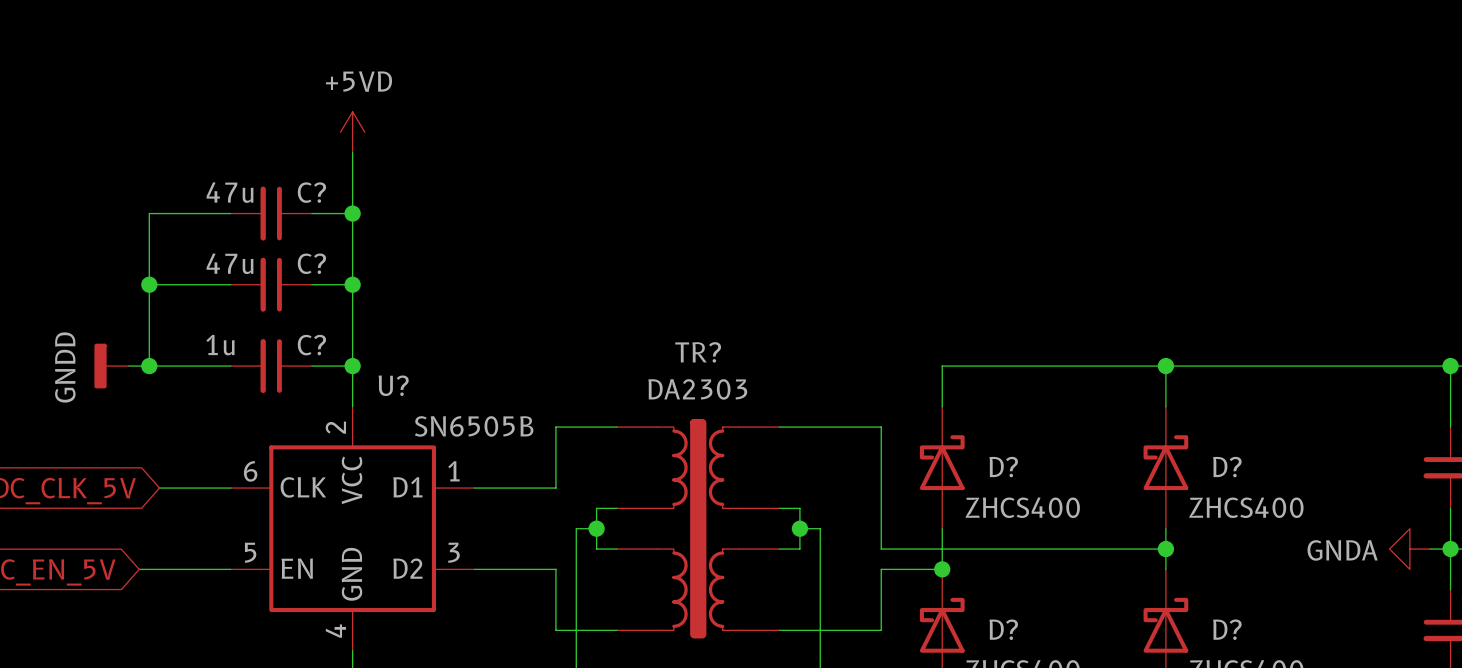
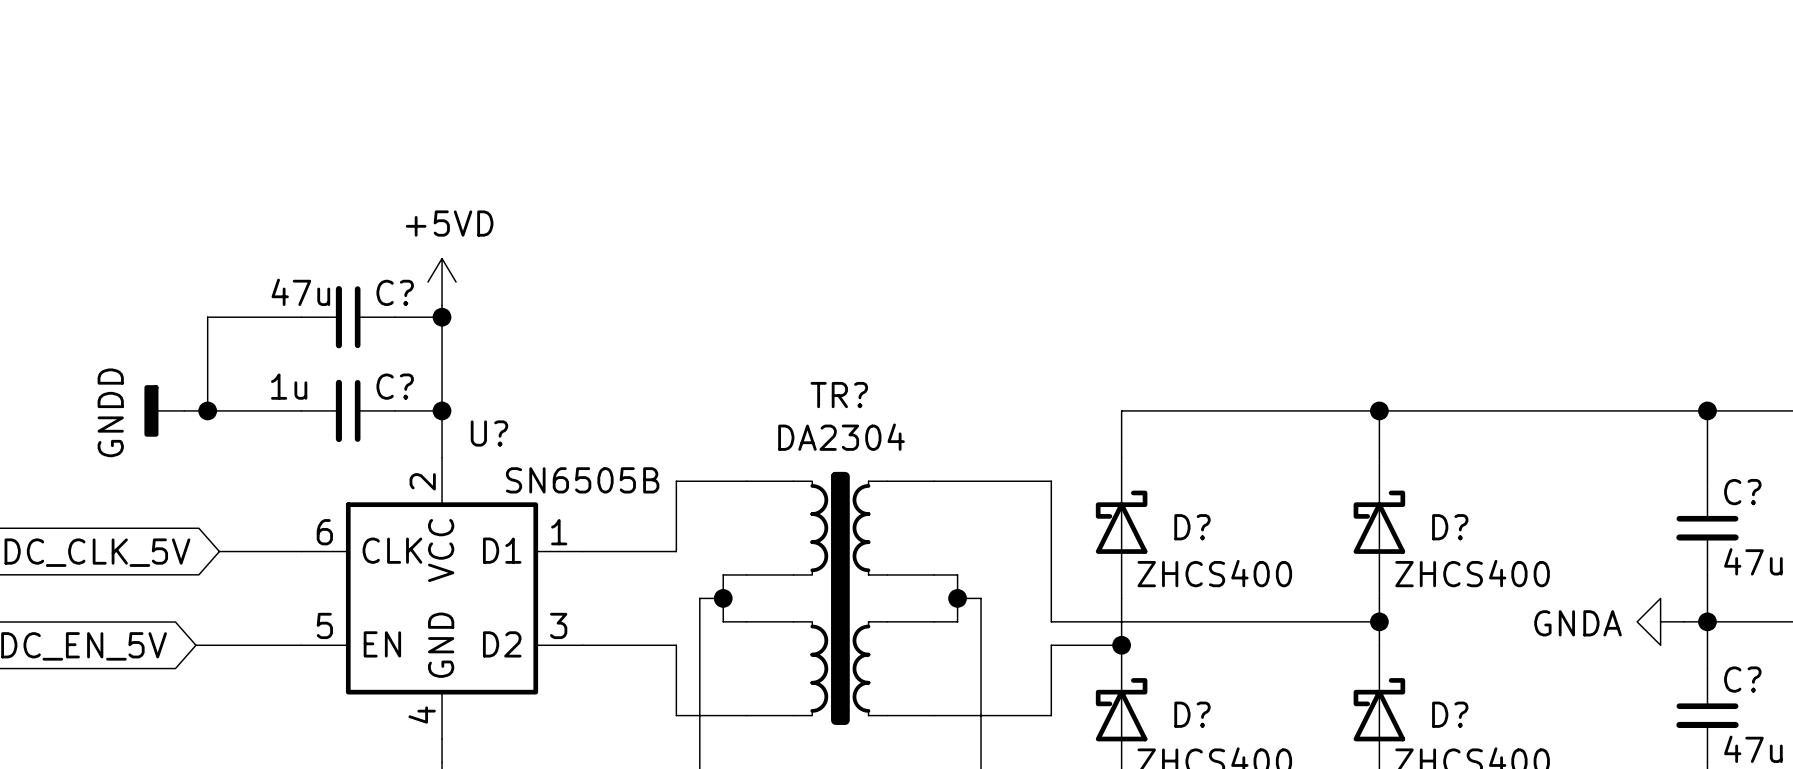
power symbol position: +5VD (352, 132) -> +5VD (442, 282)
wire: (352, 152) (352, 274) -> none
wire: (230, 213) (149, 213) (149, 284) -> none
C?: 47u (271, 213) -> none
wire: (311, 213) (352, 213) -> none
junction: (352, 213) -> none
junction: (149, 284) -> none
TR? value: DA2303 (697, 389) -> DA2304 (841, 437)

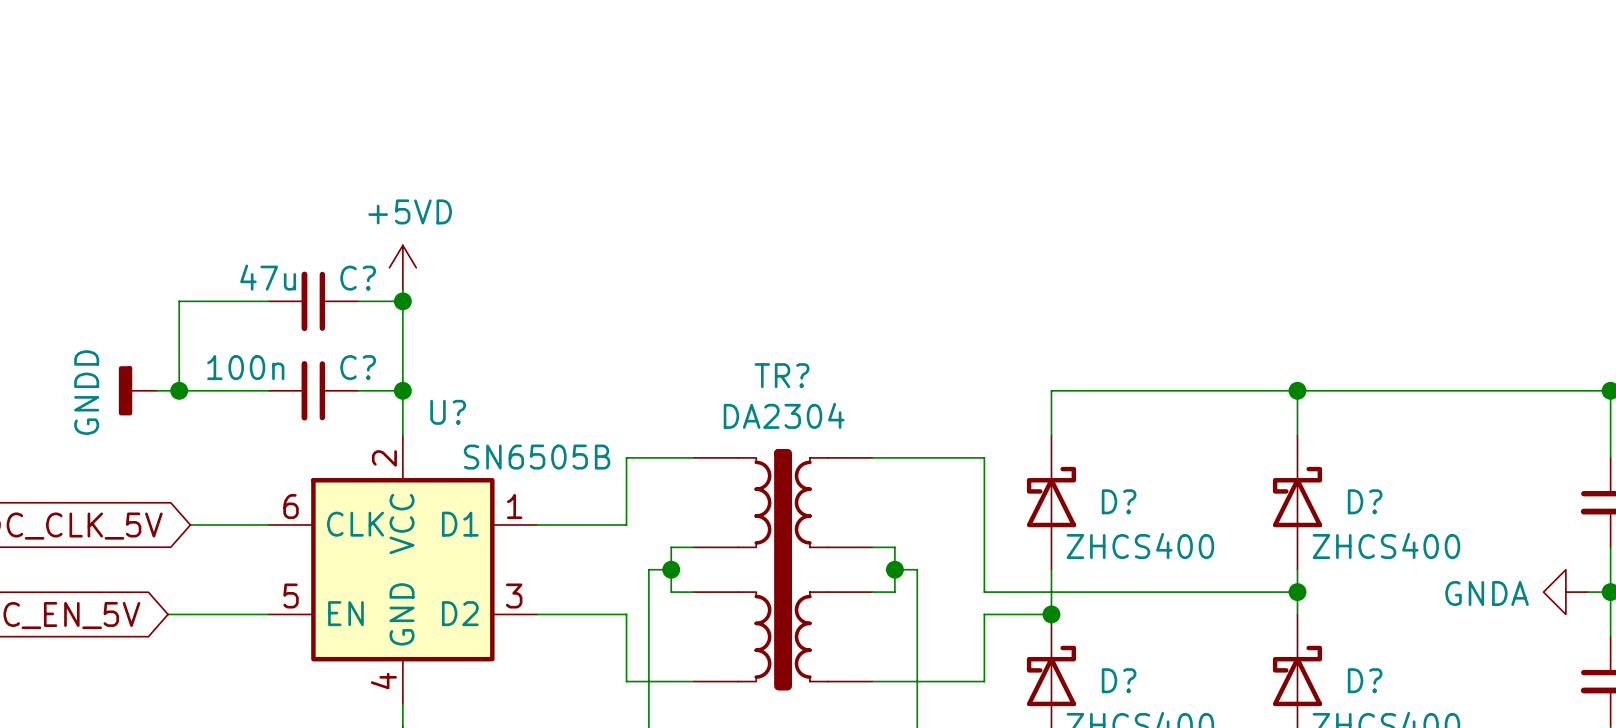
C? value: 1u (289, 386) -> 100n (245, 367)

